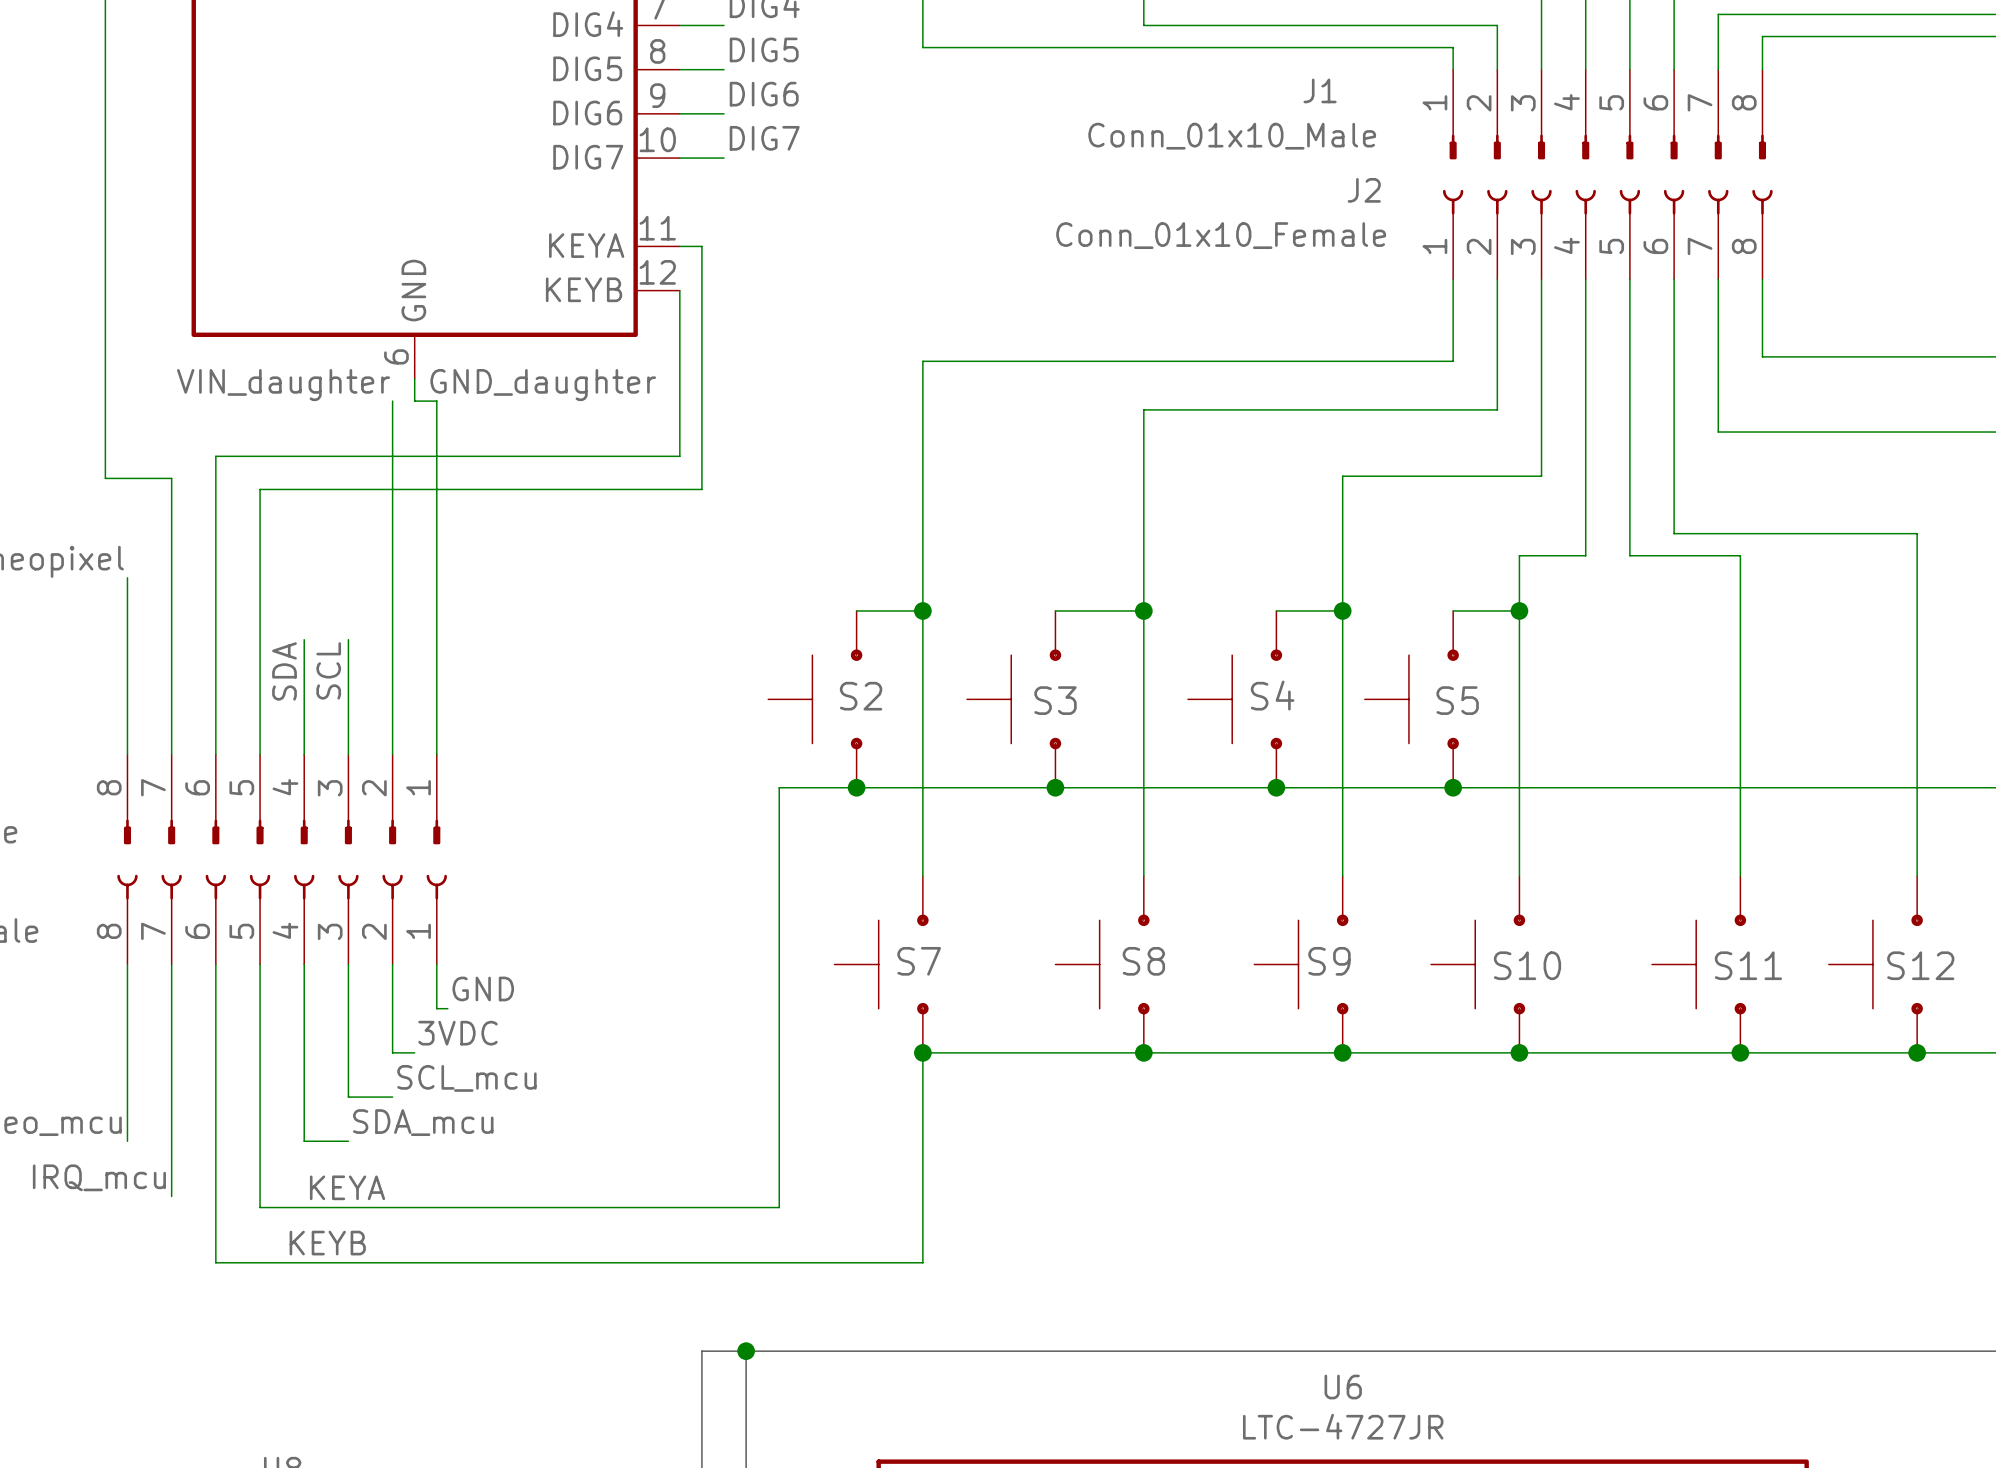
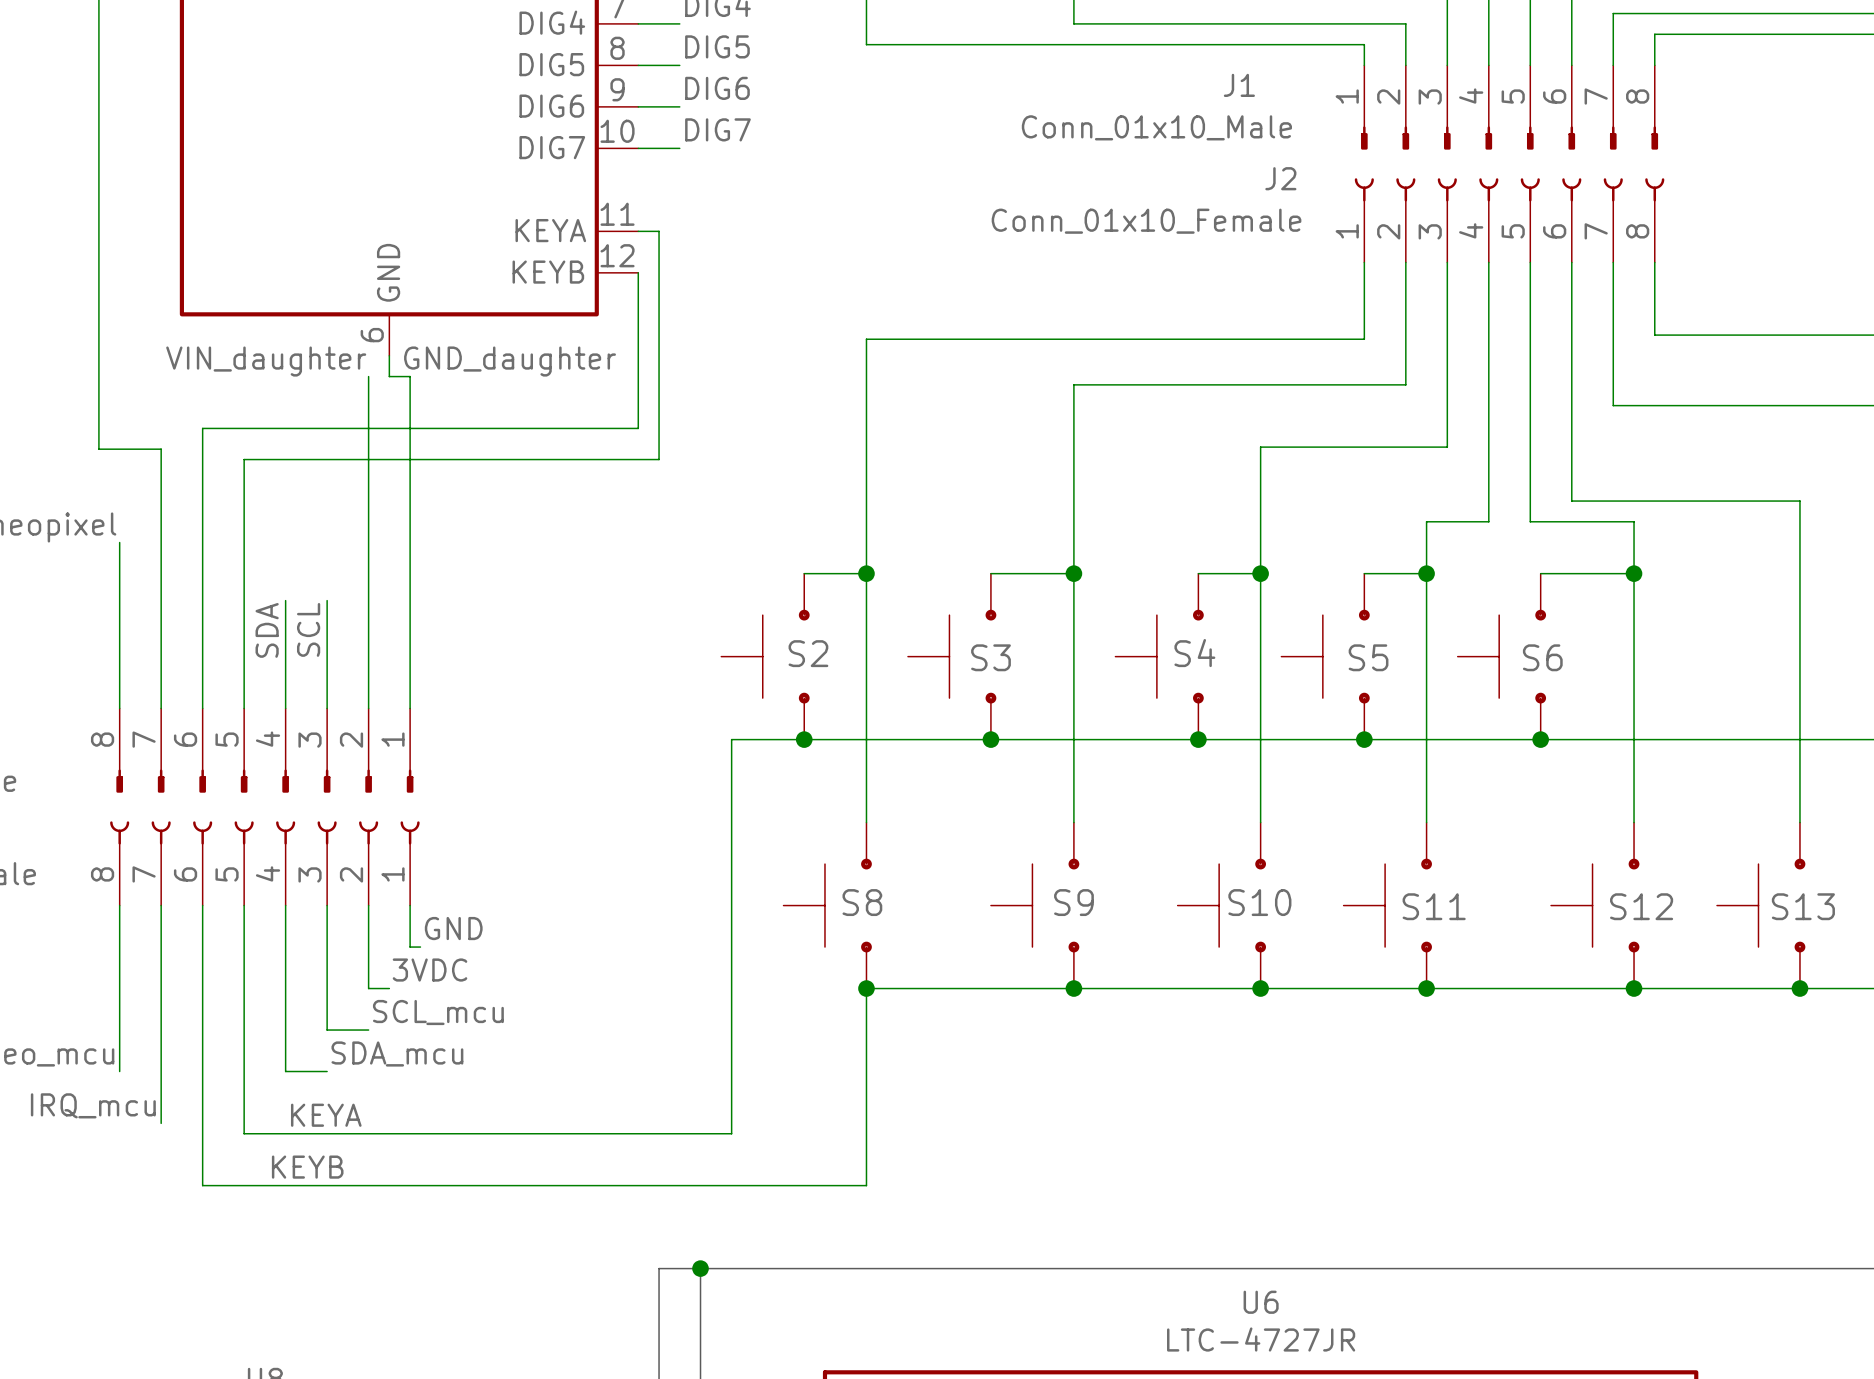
wire: none -> (1540, 573) (1634, 573)
junction: none -> (1634, 573)
S6: none -> (1501, 656)
junction: none -> (1540, 739)
S7 name: S7 (919, 961) -> S8 (862, 902)
S8 name: S8 (1143, 961) -> S9 (1073, 902)
S9 name: S9 (1329, 961) -> S10 (1259, 902)
S10 name: S10 (1527, 965) -> S11 (1434, 906)
S11 name: S11 (1748, 965) -> S12 (1641, 906)
S12 name: S12 (1920, 965) -> S13 (1803, 906)

